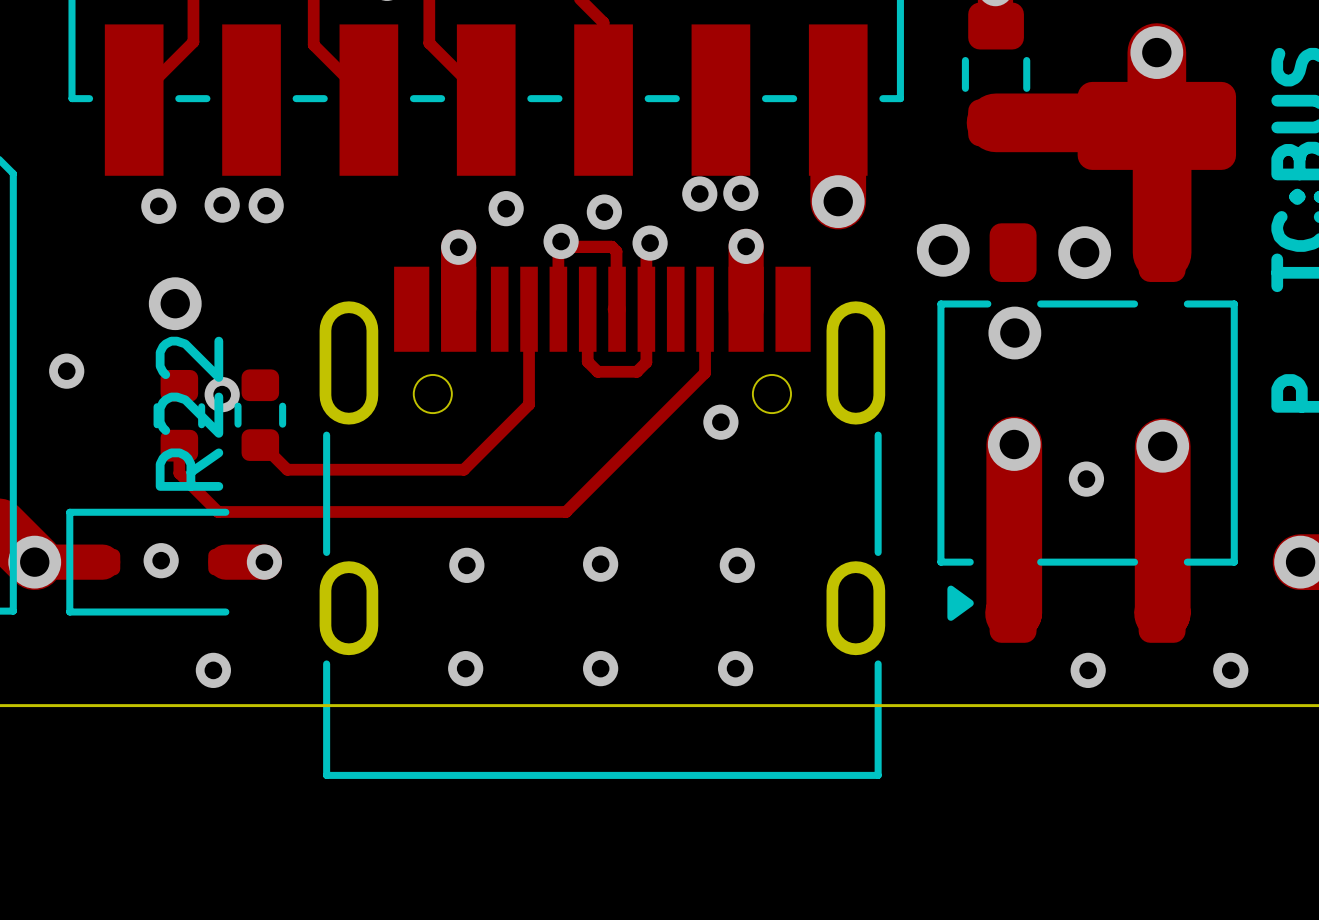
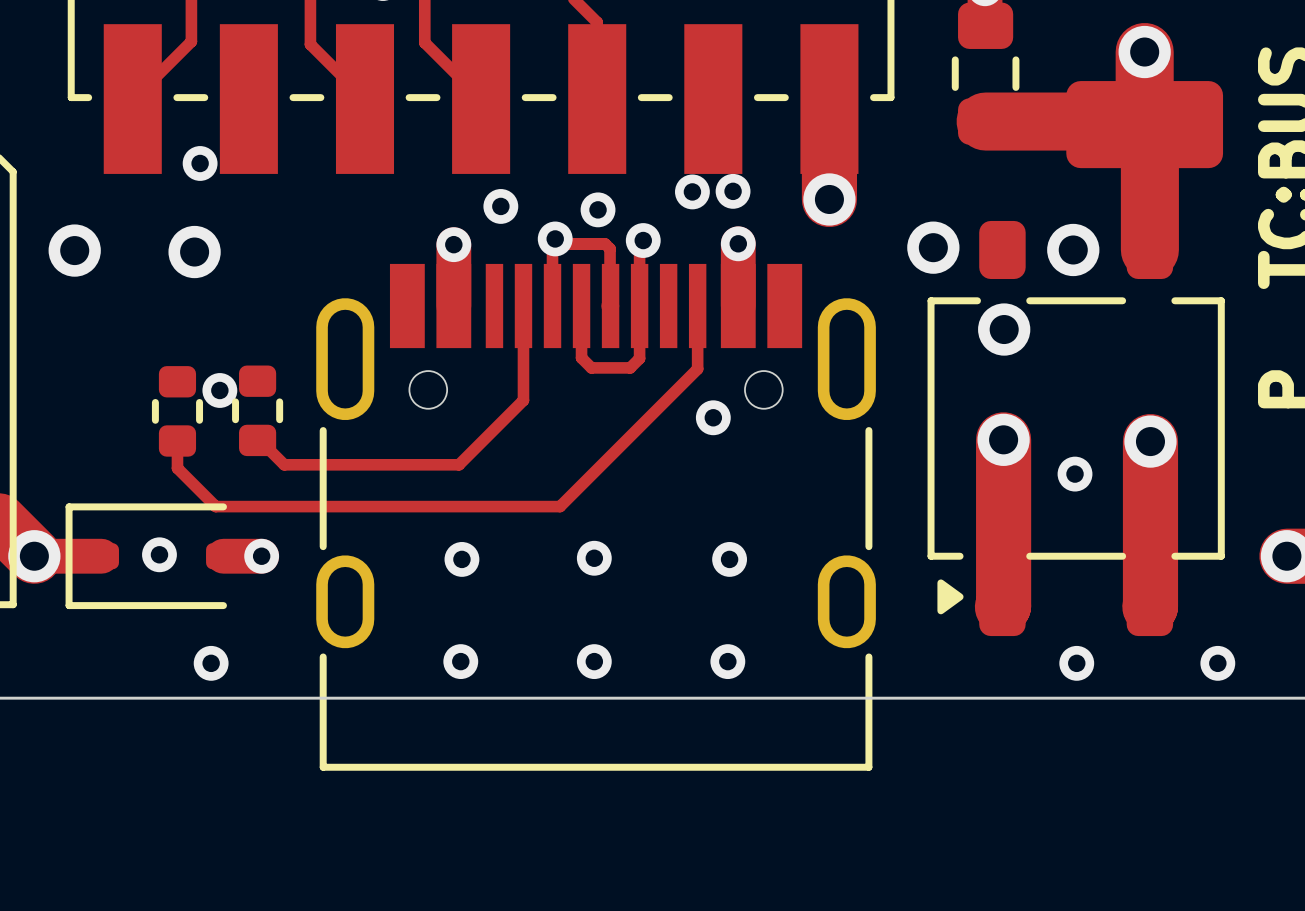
via: none -> (200, 163)
via: (222, 205) -> none
via: (266, 205) -> none
via: (158, 206) -> none
via: none -> (74, 250)
via position: (175, 303) -> (194, 252)
via: (66, 371) -> none
R22 name: R22 (189, 413) -> none

